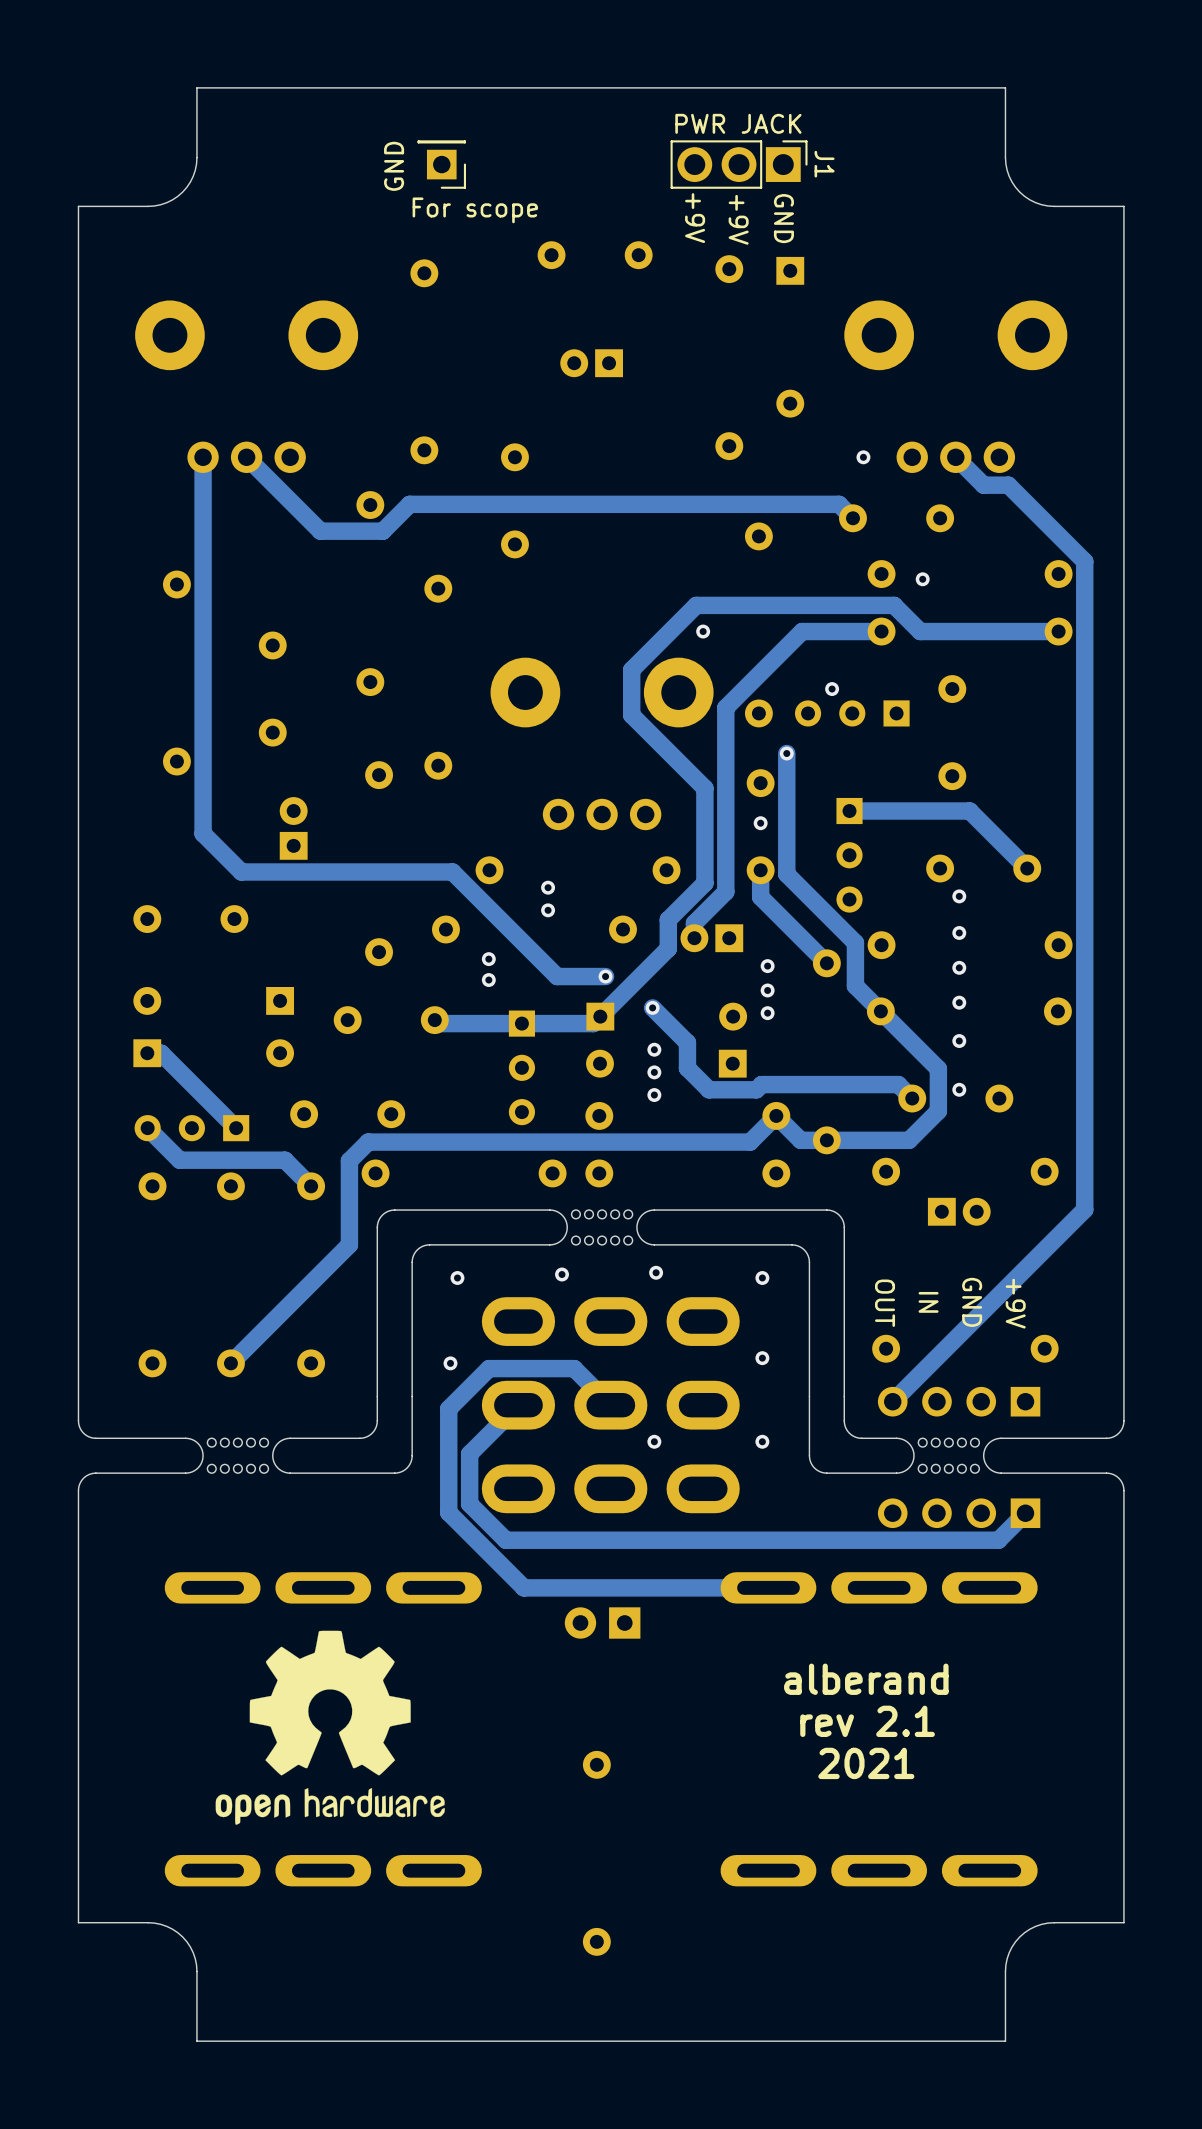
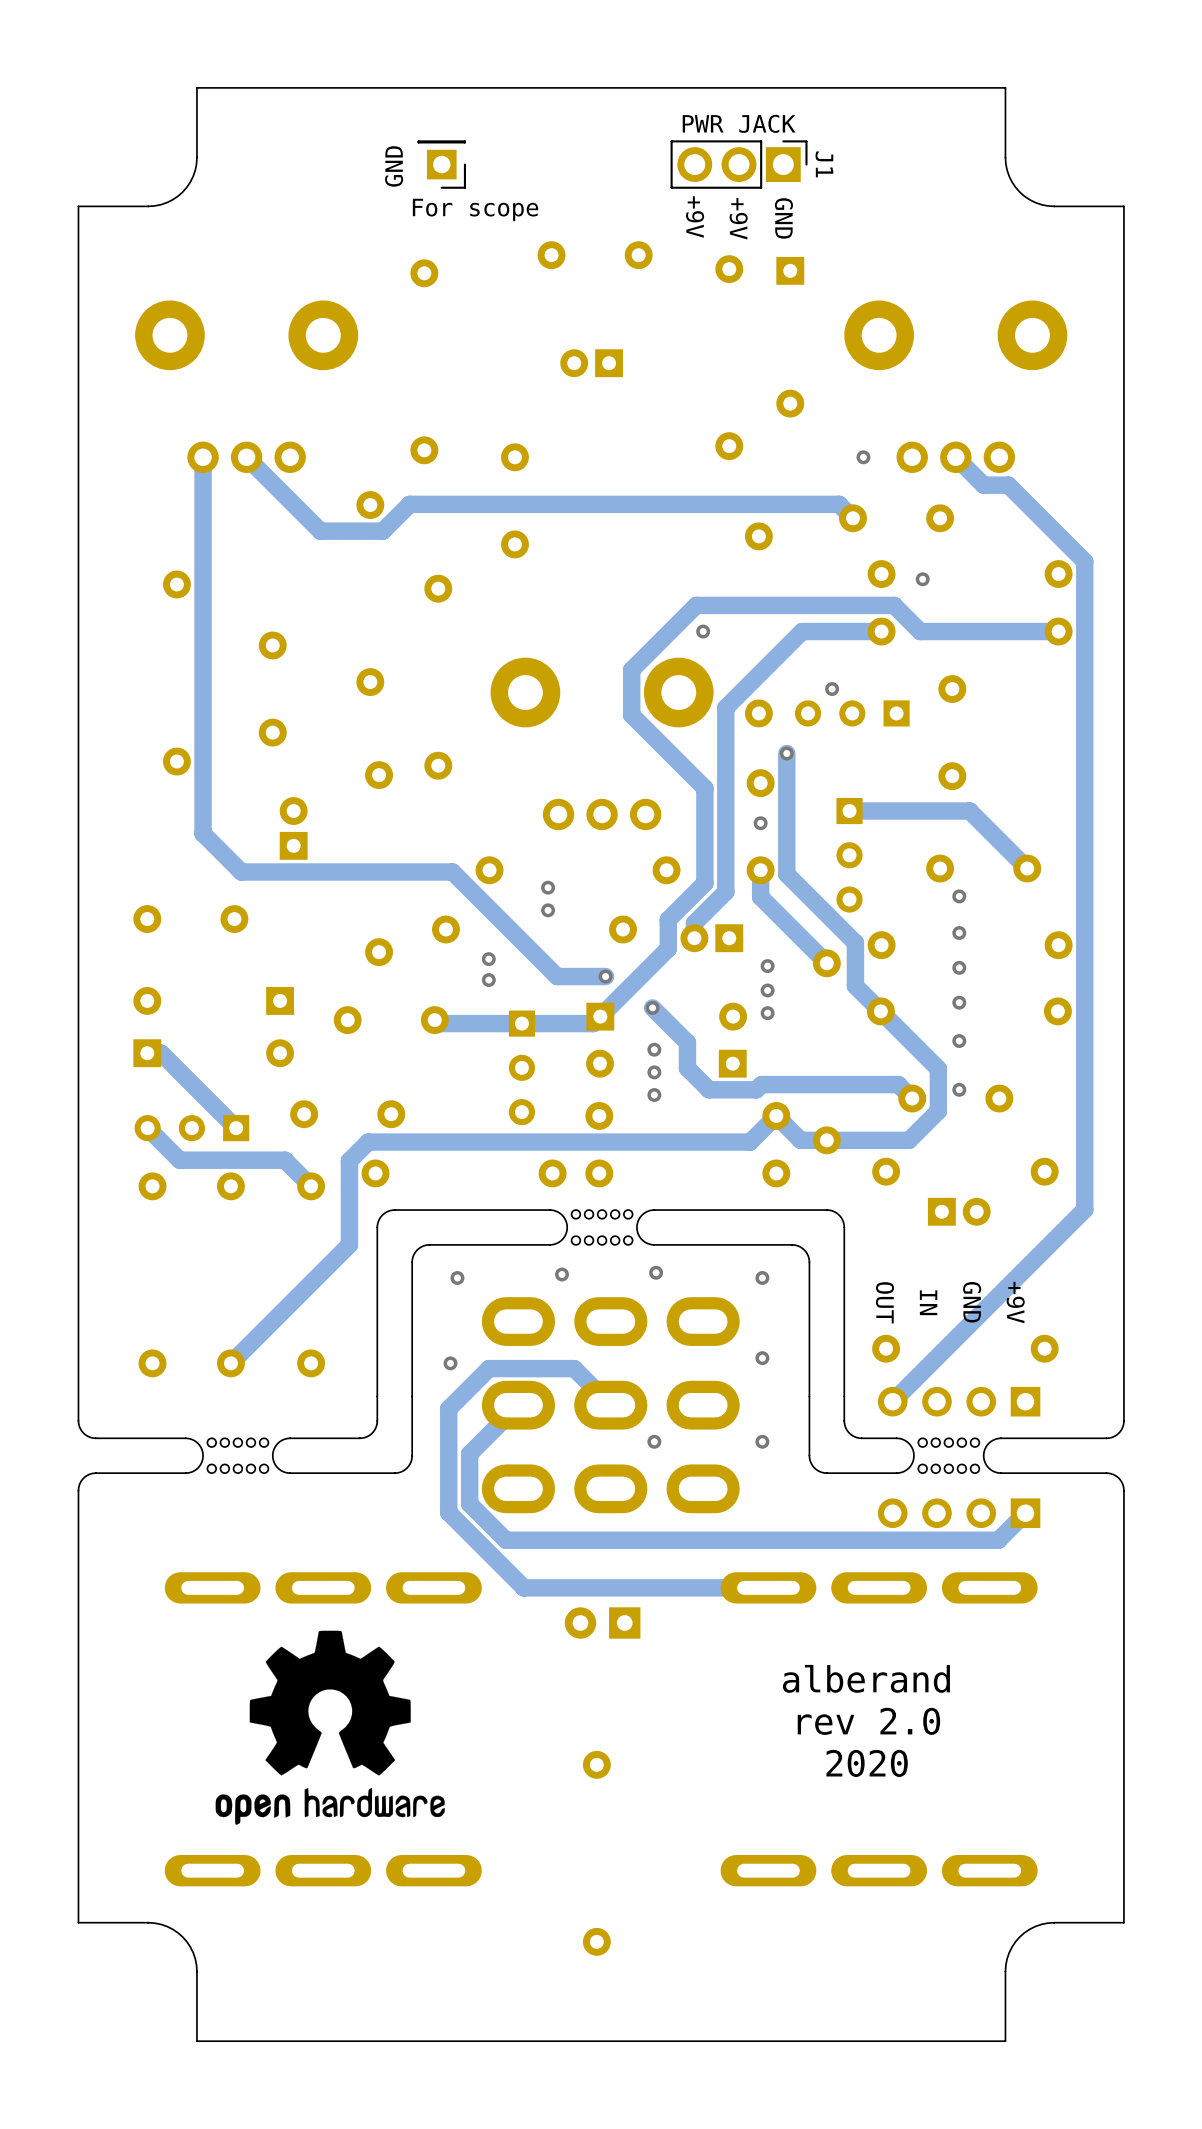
text: rev 2.1 (867, 1721) -> rev 2.0 (868, 1721)
text: 2021 (866, 1763) -> 2020 (867, 1763)

